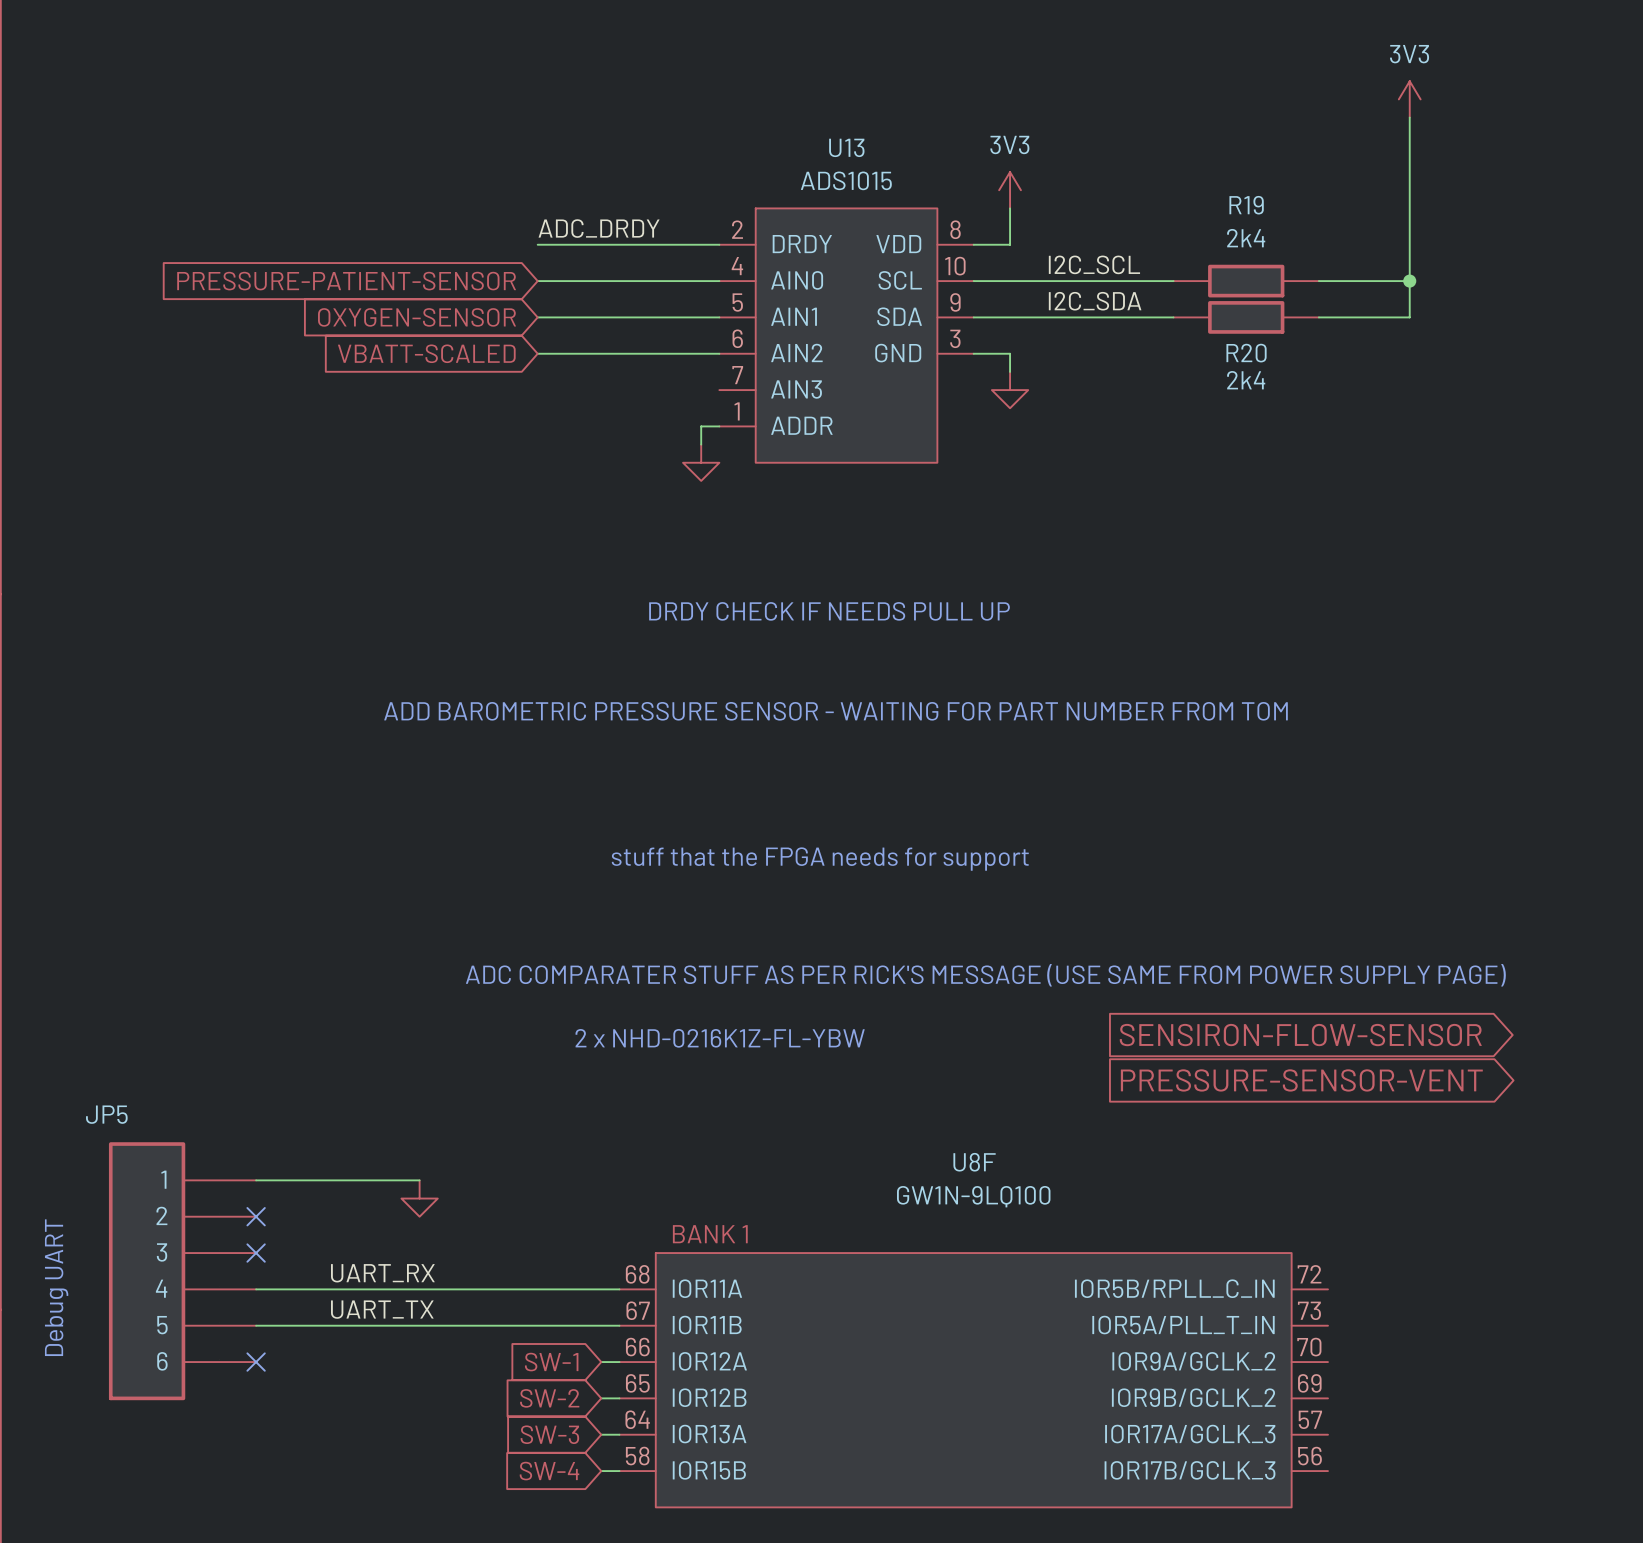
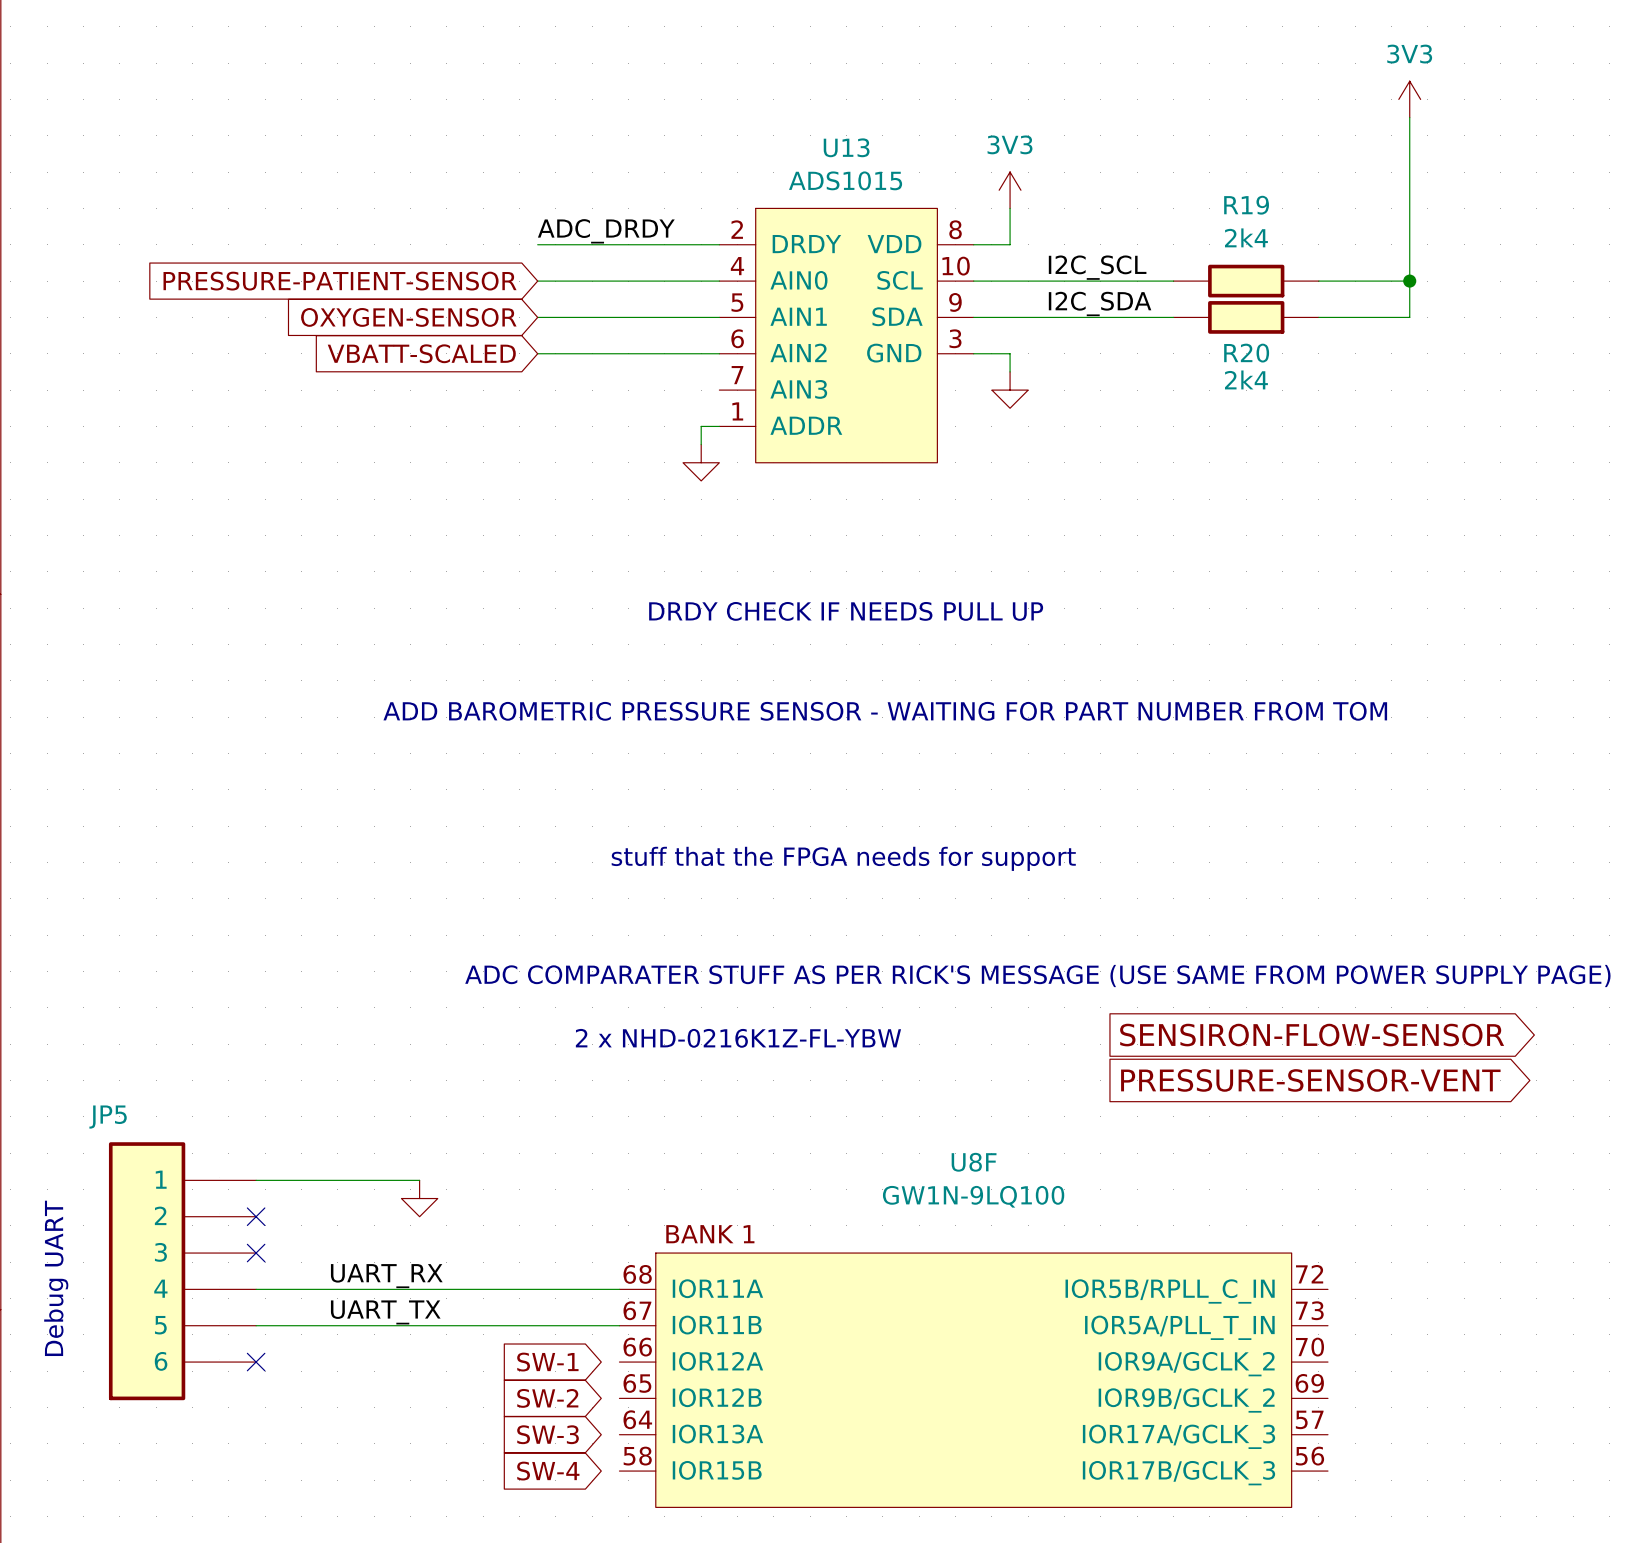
wire: (601, 1362) (619, 1362) -> none
wire: (601, 1398) (619, 1398) -> none
wire: (601, 1434) (619, 1434) -> none
wire: (601, 1471) (619, 1471) -> none

